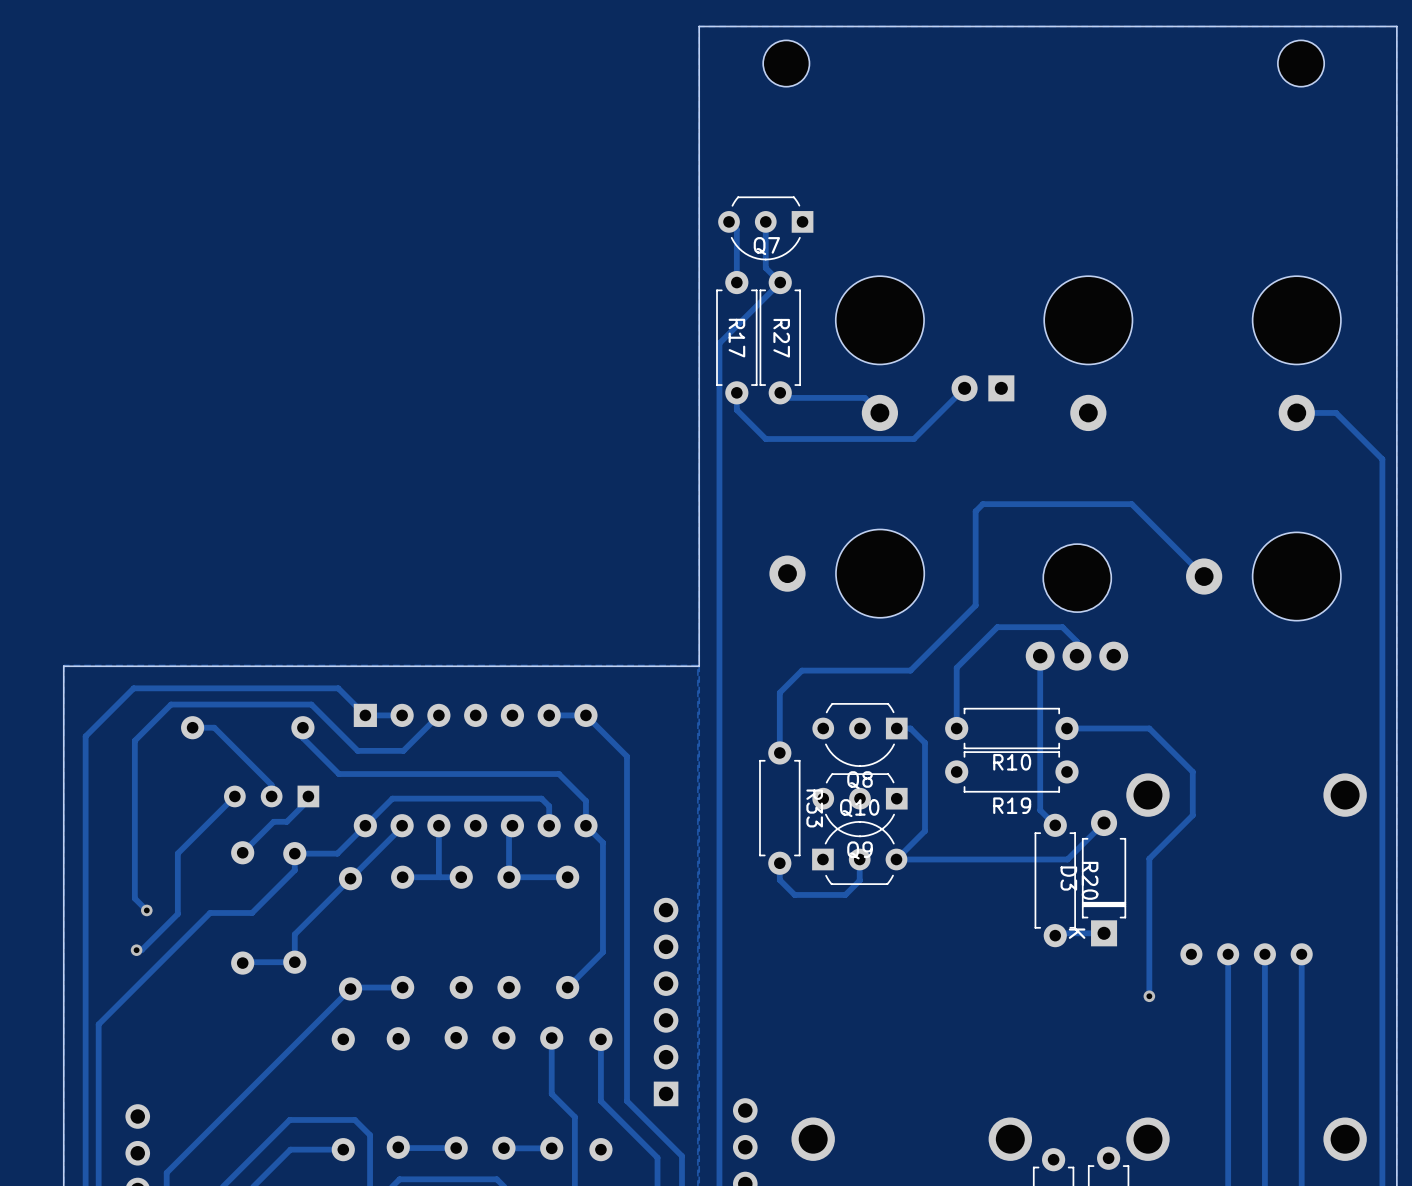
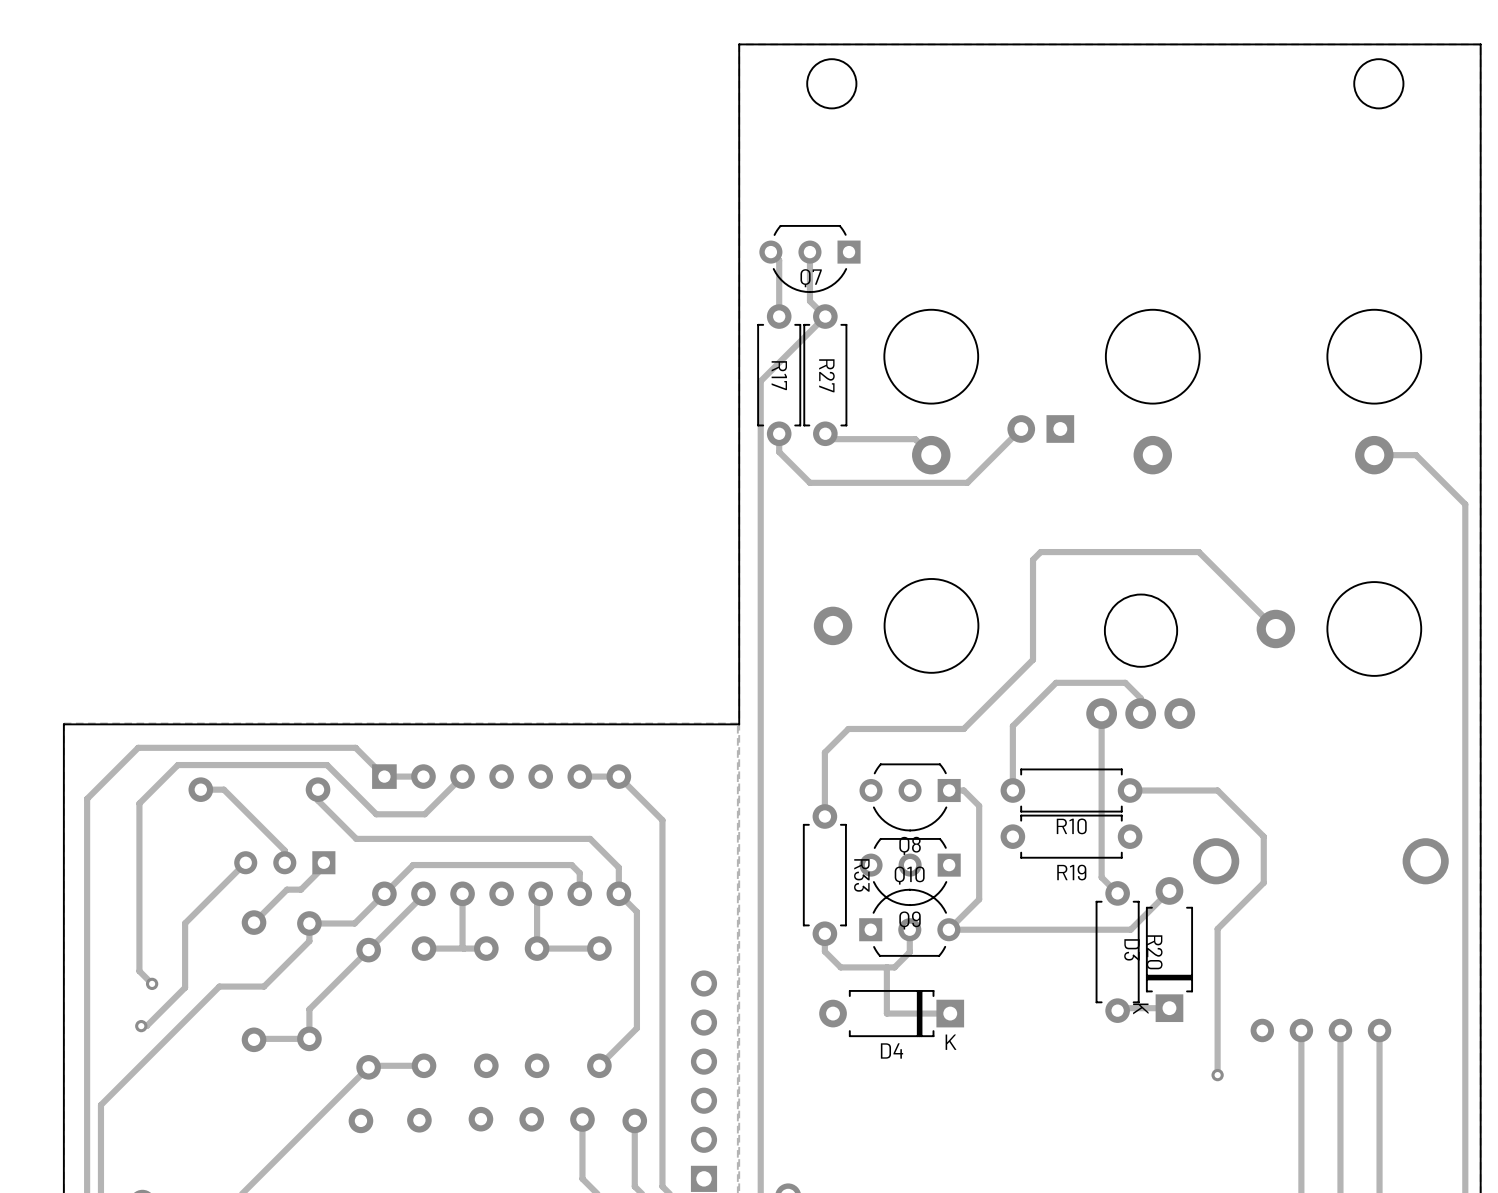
track: none -> (886, 967) (886, 1013) (950, 1013)
D4: none -> (891, 1013)

